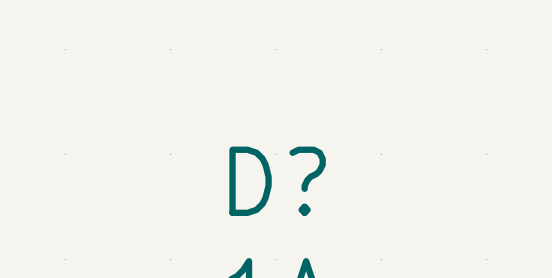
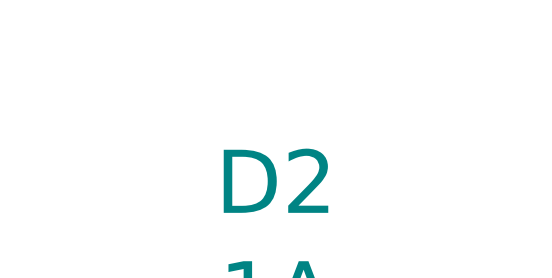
D? name: D? (277, 181) -> D2 (276, 180)

